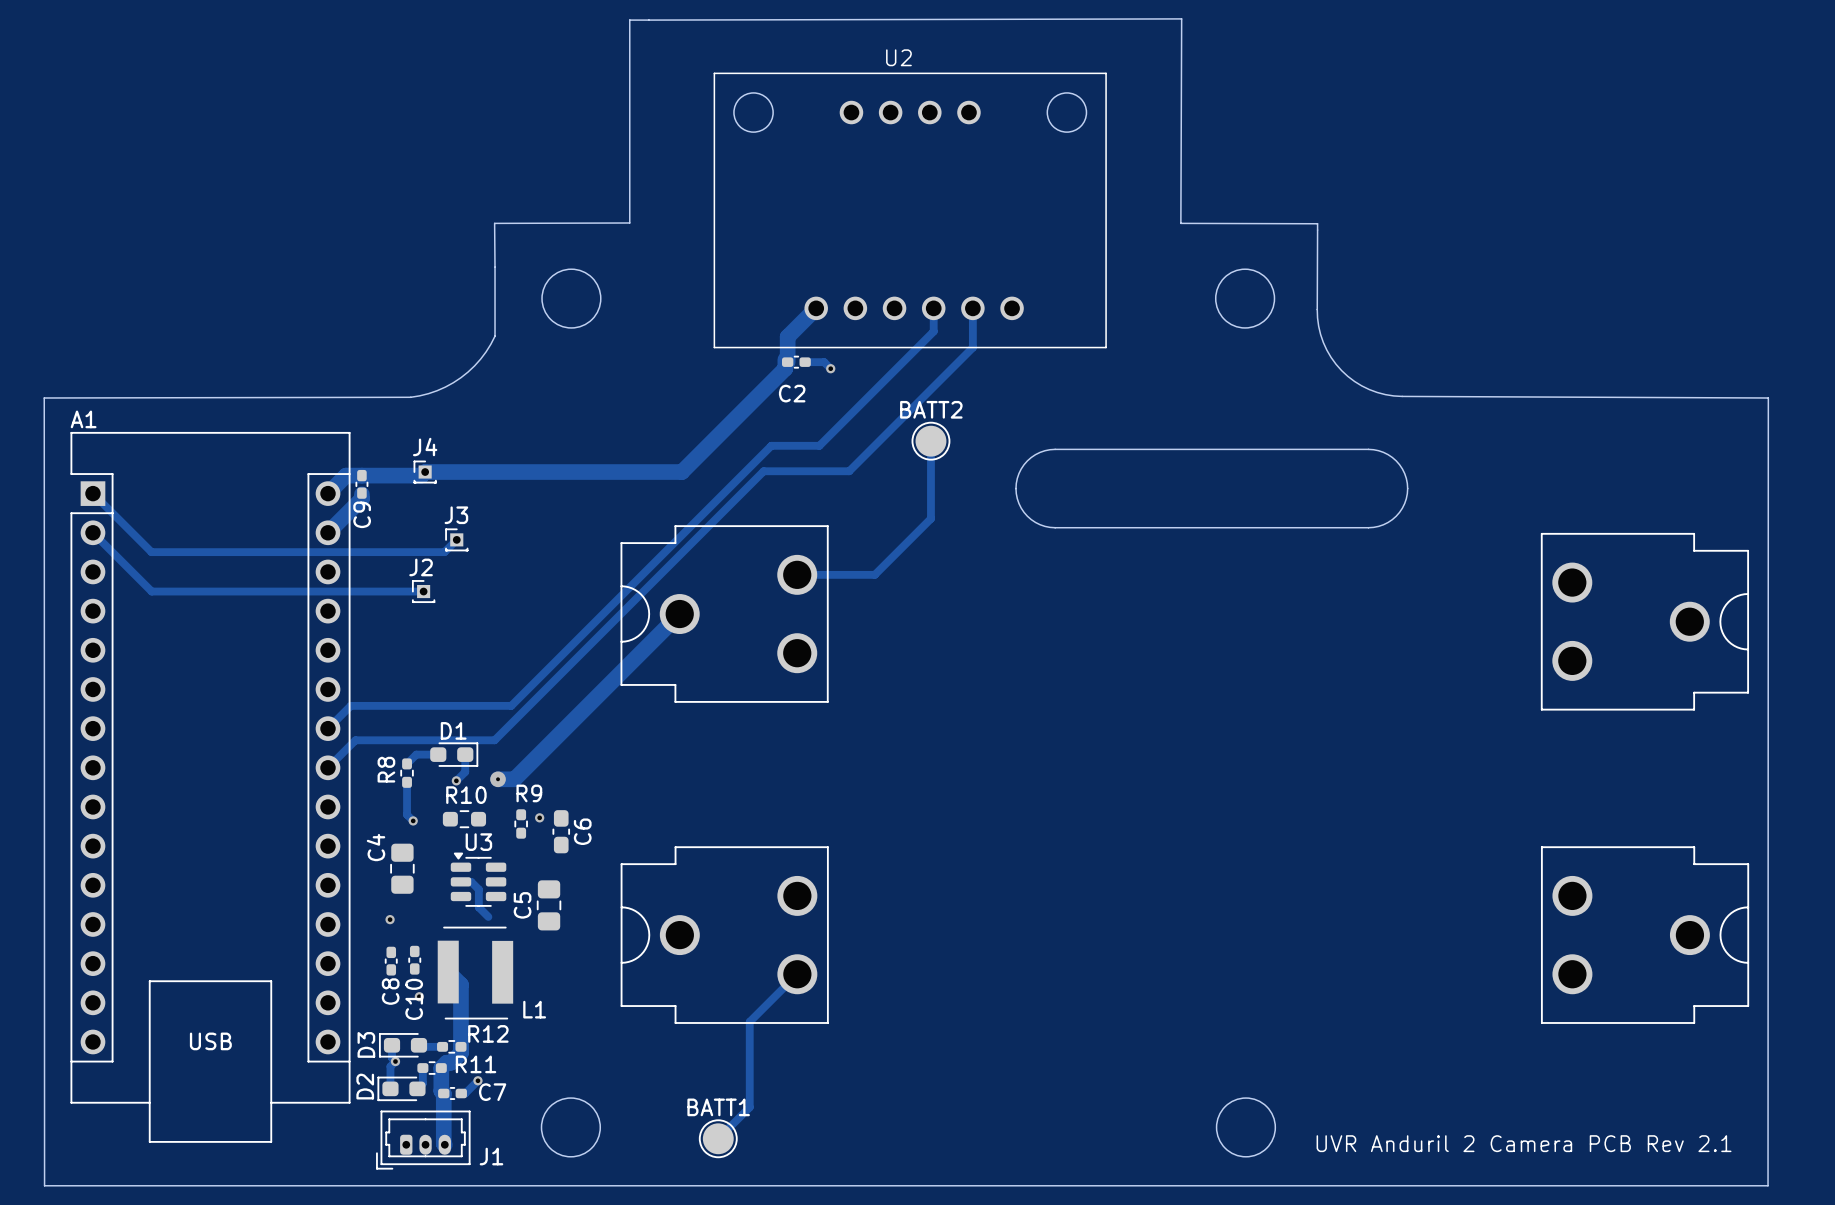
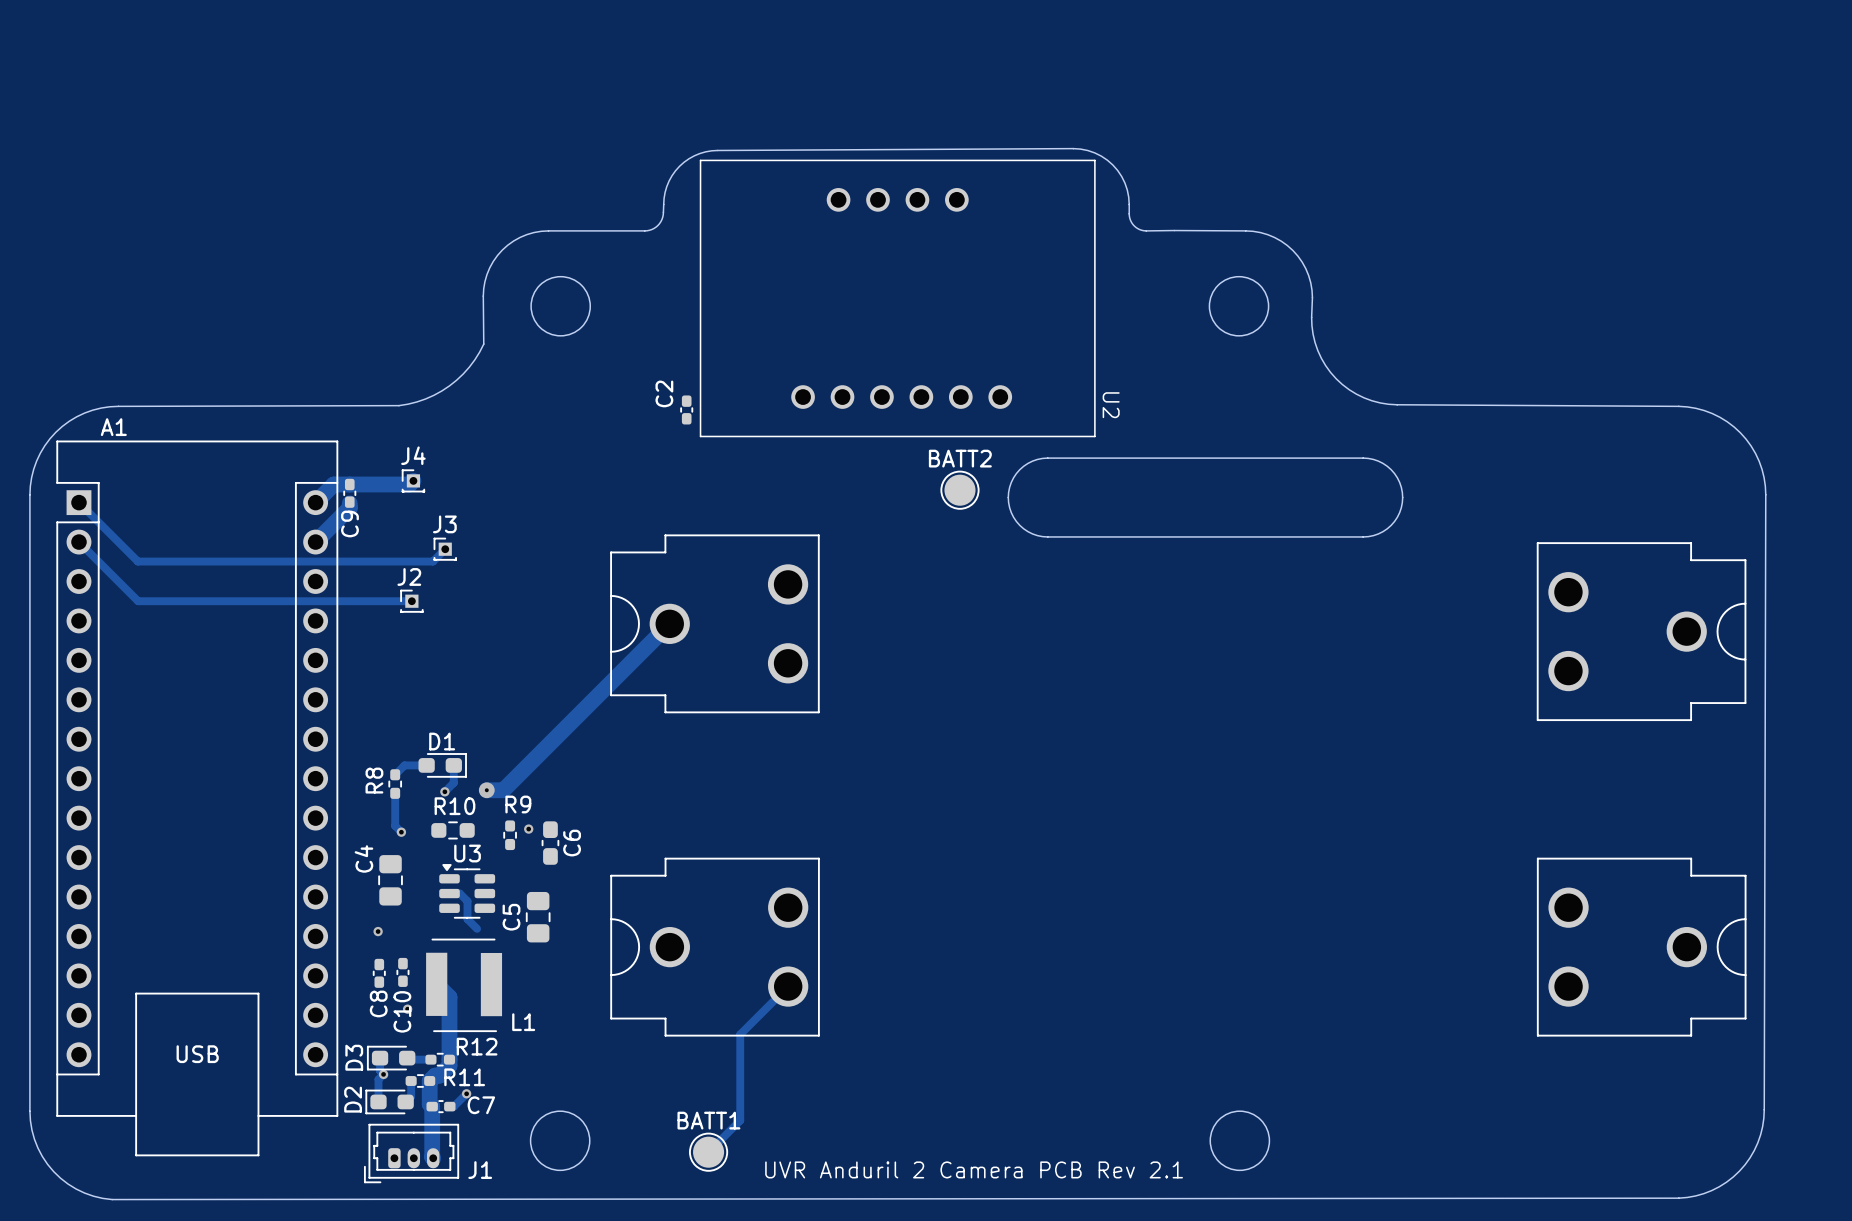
U2 name position: U2 (898, 57) -> U2 (1111, 405)
U2 footprint: [713, 72, 1107, 349] -> [699, 159, 1096, 438]
track: (816, 308) (787, 336) (787, 362) -> none
track: (933, 308) (933, 331) (819, 445) (771, 445) (511, 705) (350, 705) (328, 728) -> none
track: (972, 308) (972, 347) (849, 471) (763, 471) (494, 740) (355, 740) (328, 767) -> none
board edge: (1317, 309) (1317, 223) (1180, 223) (1181, 18) (629, 20) (629, 222) (494, 223) (495, 336) -> (1311, 317) (1312, 290) (1308, 275) (1297, 256) (1287, 245) (1267, 234) (1253, 231) (1139, 229) (1130, 220) (1127, 190) (1121, 176) (1107, 160) (1087, 150) (1073, 148) (717, 150) (694, 155) (675, 170) (665, 192) (662, 219) (651, 229) (541, 231) (526, 234) (507, 245) (493, 261) (484, 281) (483, 344)
track: (785, 359) (785, 368) (681, 472) (425, 472) -> none
C2 rotation: 0° (796, 362) -> 90° clockwise (686, 409)
C2 position: (796, 362) -> (686, 409)
track: (805, 362) (824, 362) (830, 368) -> none
via: (830, 368) -> none
board edge: (1402, 396) (1768, 398) (1768, 1185) (44, 1185) (44, 398) (410, 397) -> (1397, 404) (1687, 406) (1712, 413) (1734, 426) (1751, 446) (1759, 461) (1764, 477) (1765, 494) (1763, 1118) (1757, 1142) (1749, 1157) (1739, 1171) (1719, 1186) (1703, 1193) (1678, 1198) (112, 1199) (84, 1193) (68, 1184) (47, 1164) (37, 1148) (30, 1120) (29, 494) (31, 477) (36, 460) (44, 445) (62, 426) (76, 416) (101, 408) (118, 406) (398, 405)
A1 name position: A1 (83, 419) -> A1 (113, 427)
track: (930, 441) (930, 518) (874, 574) (797, 574) -> none
BATT2 position: (930, 441) -> (959, 490)
text: UVR Anduril 2 Camera PCB Rev 2.1 (1524, 1143) -> none
text: none -> UVR Anduril 2 Camera PCB Rev 2.1 (974, 1169)

